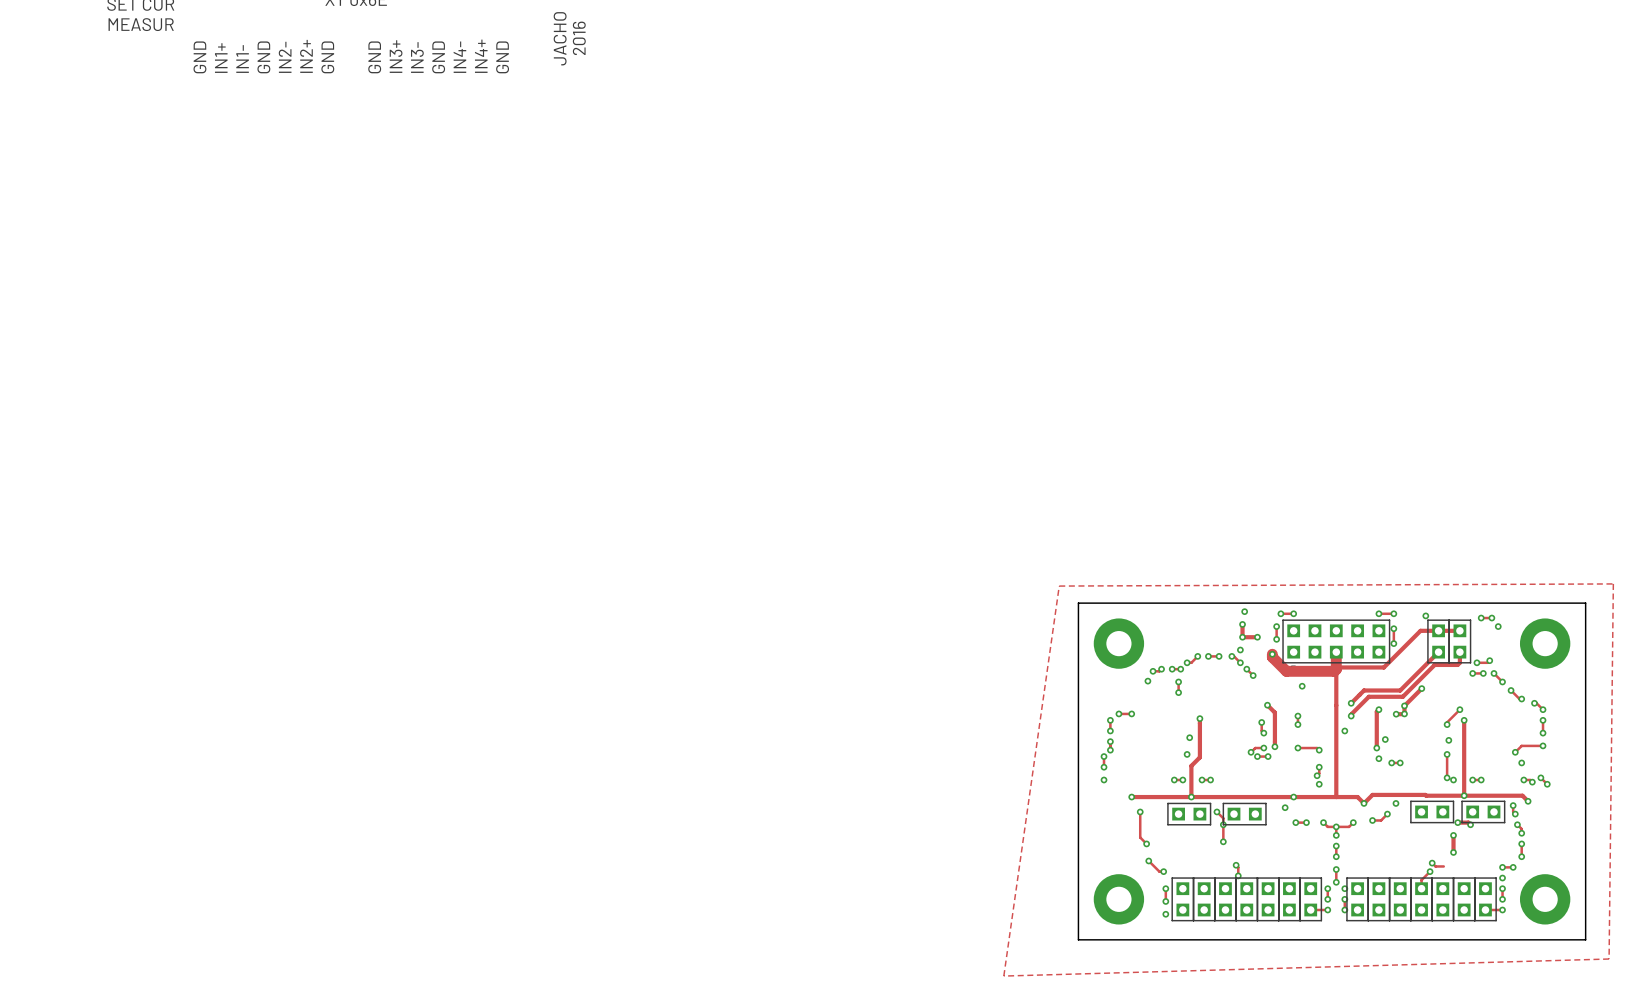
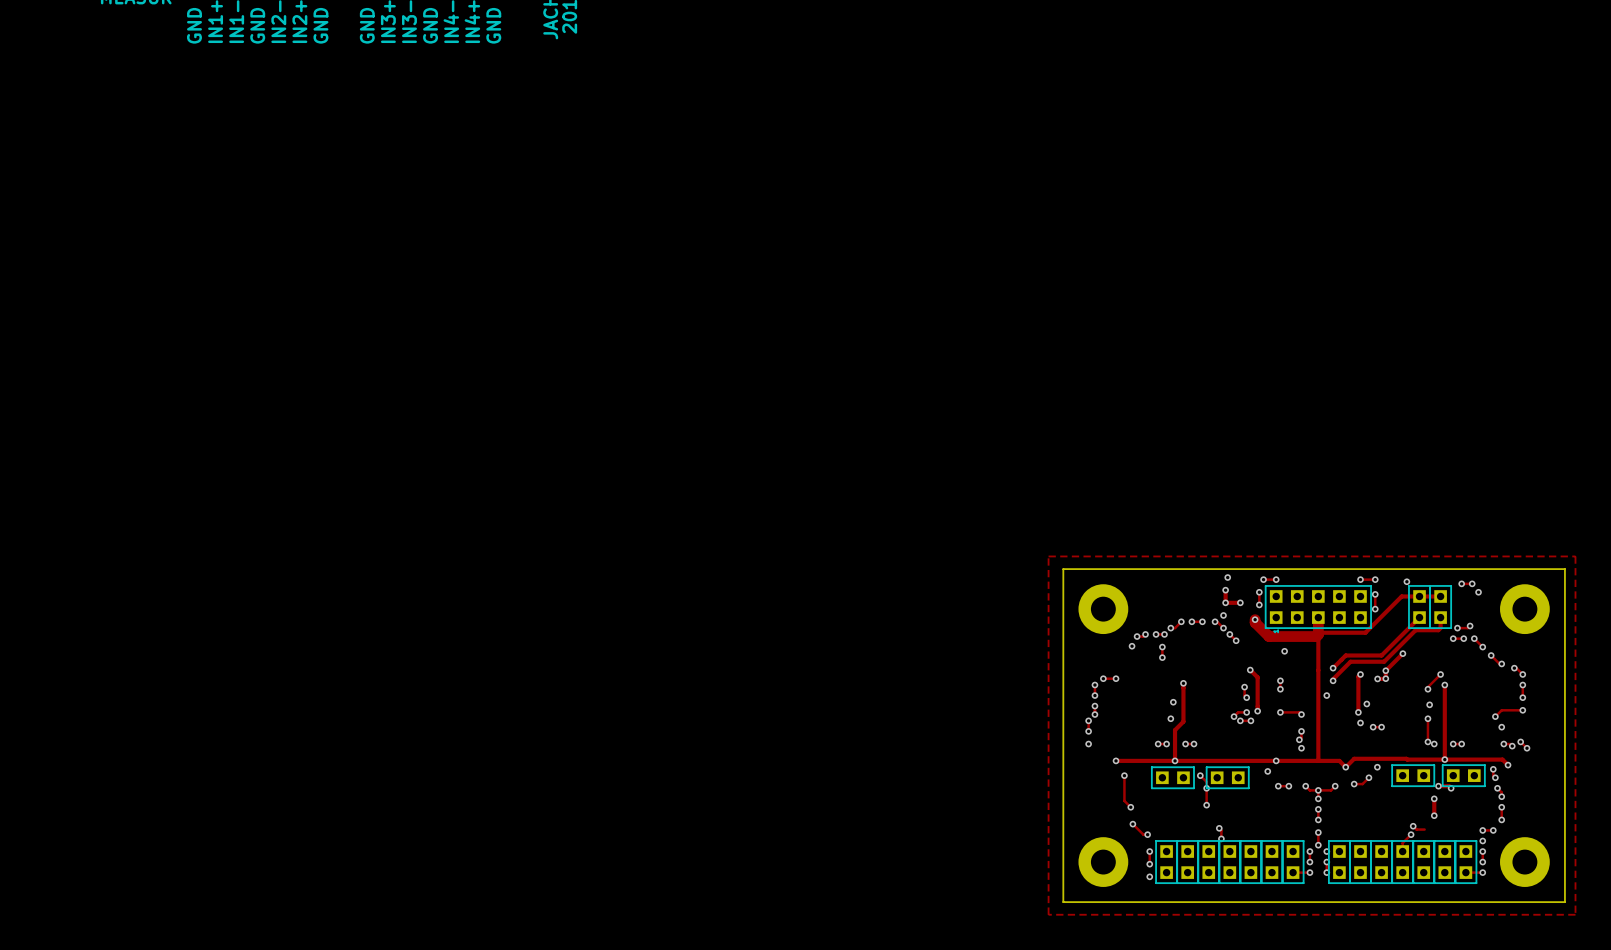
zone outline: (1613, 583) (1059, 586) (1003, 976) (1609, 959) (1613, 583) -> (1048, 556) (1048, 914) (1575, 914) (1575, 556) (1048, 556)

